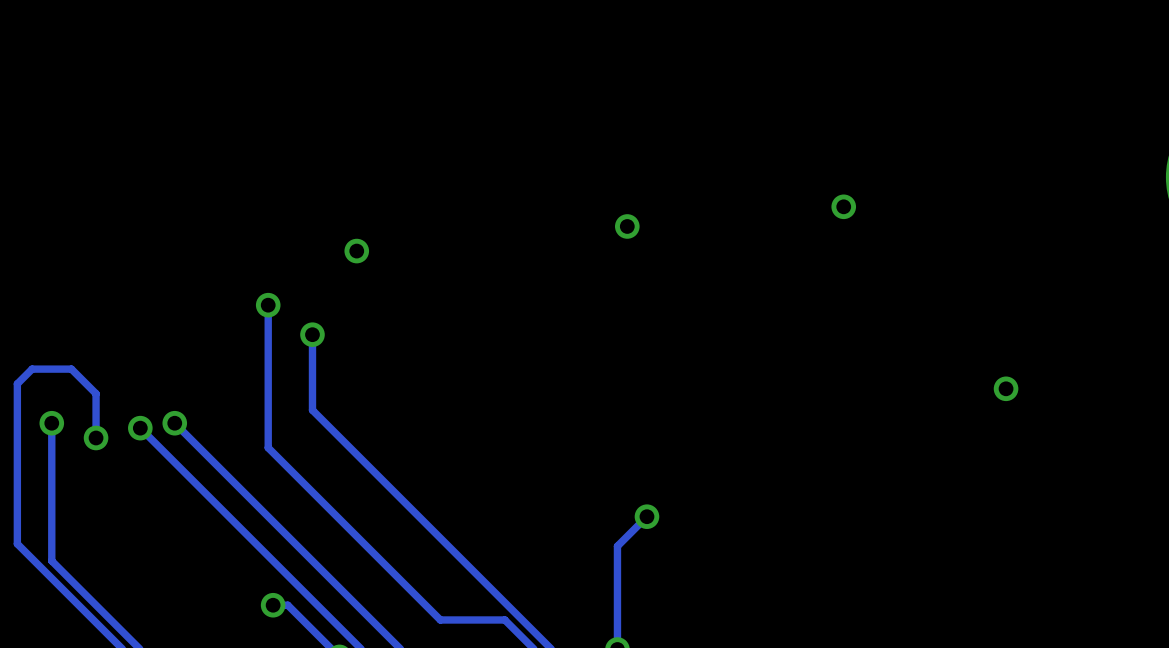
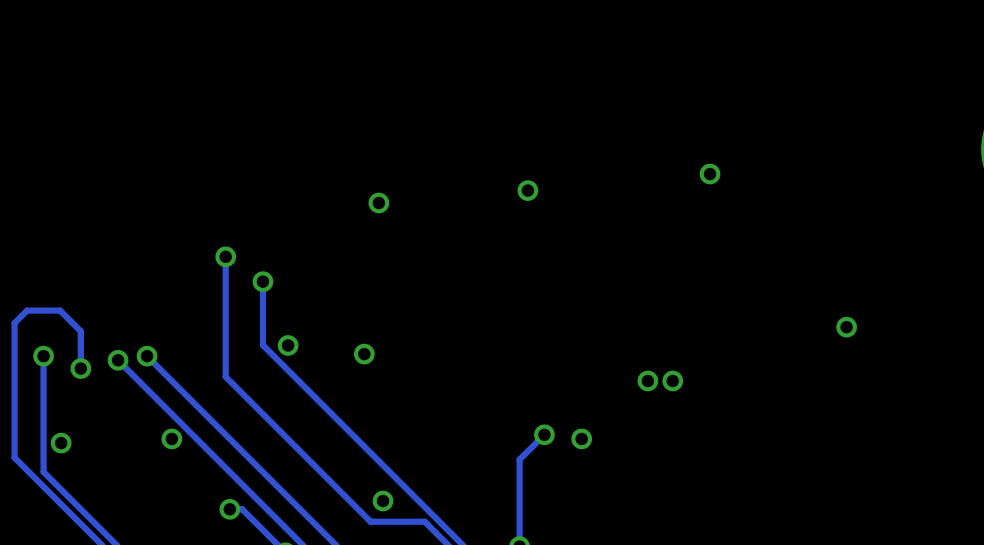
via: none -> (378, 203)
via: (356, 251) -> none
via: none -> (288, 345)
via: none -> (364, 354)
via: none -> (647, 380)
via: none -> (672, 380)
via: none -> (171, 438)
via: none -> (581, 438)
via: none -> (61, 443)
via: none -> (383, 501)

